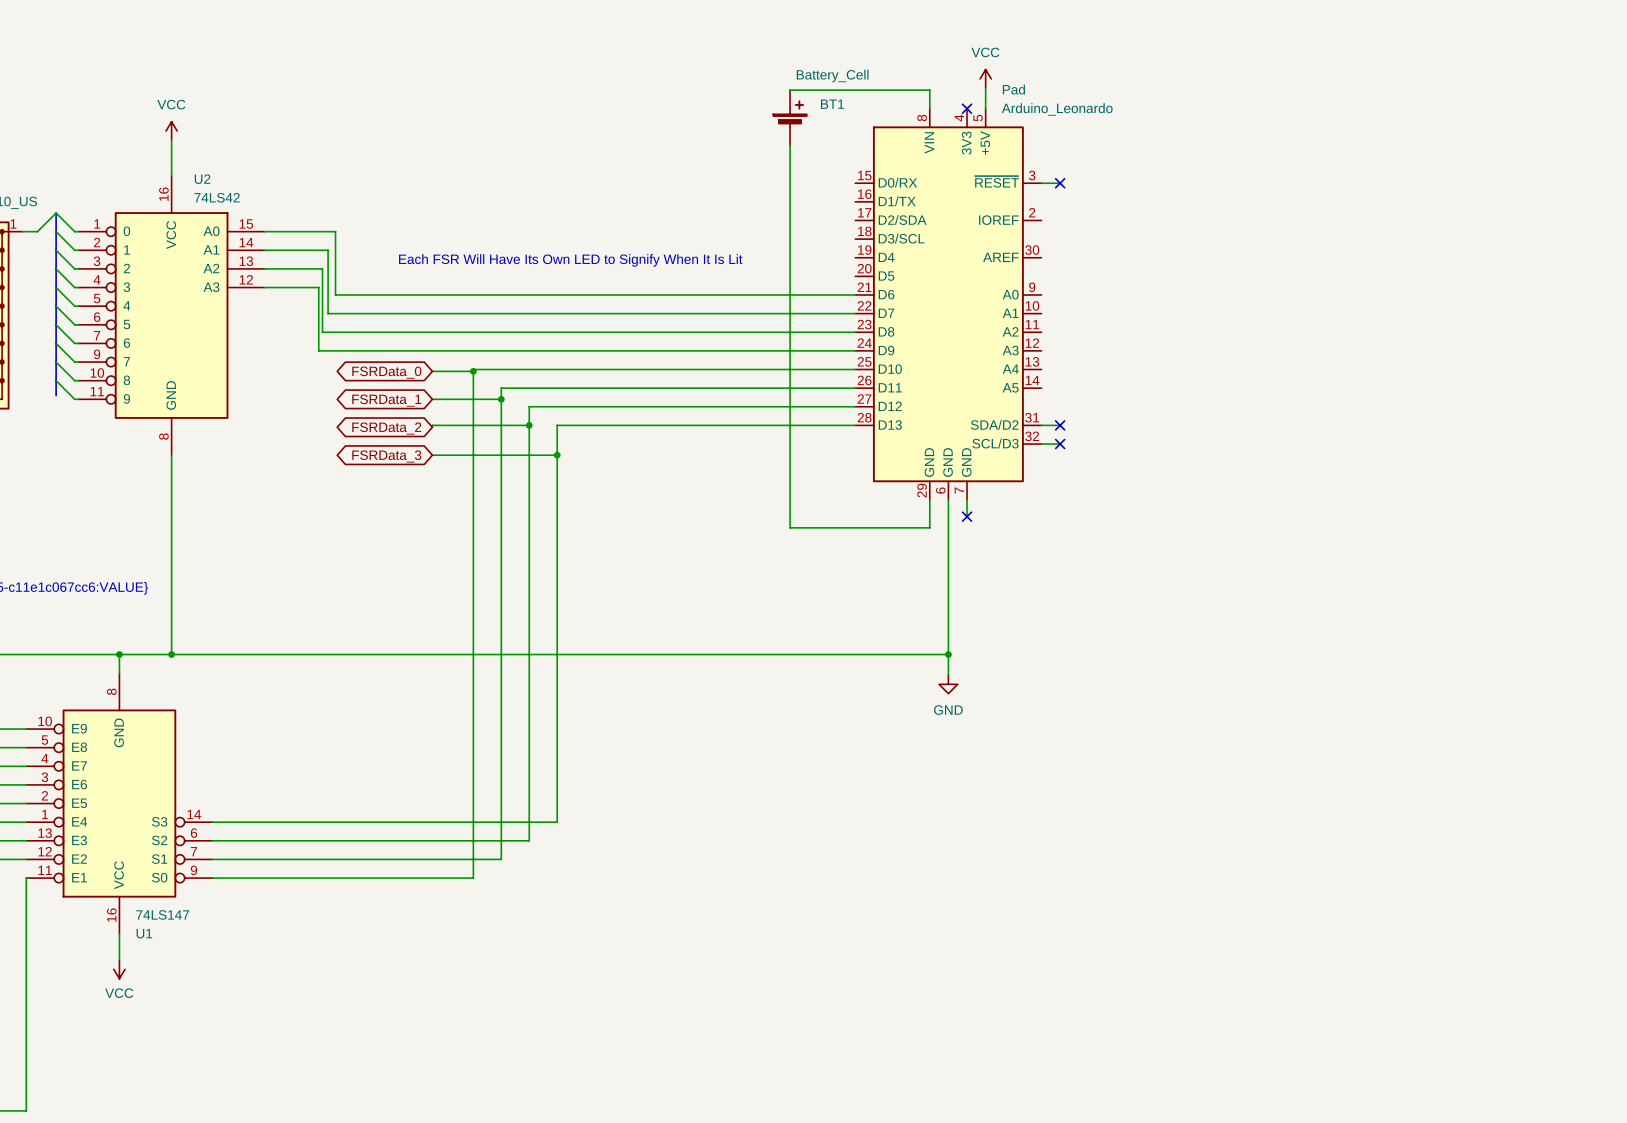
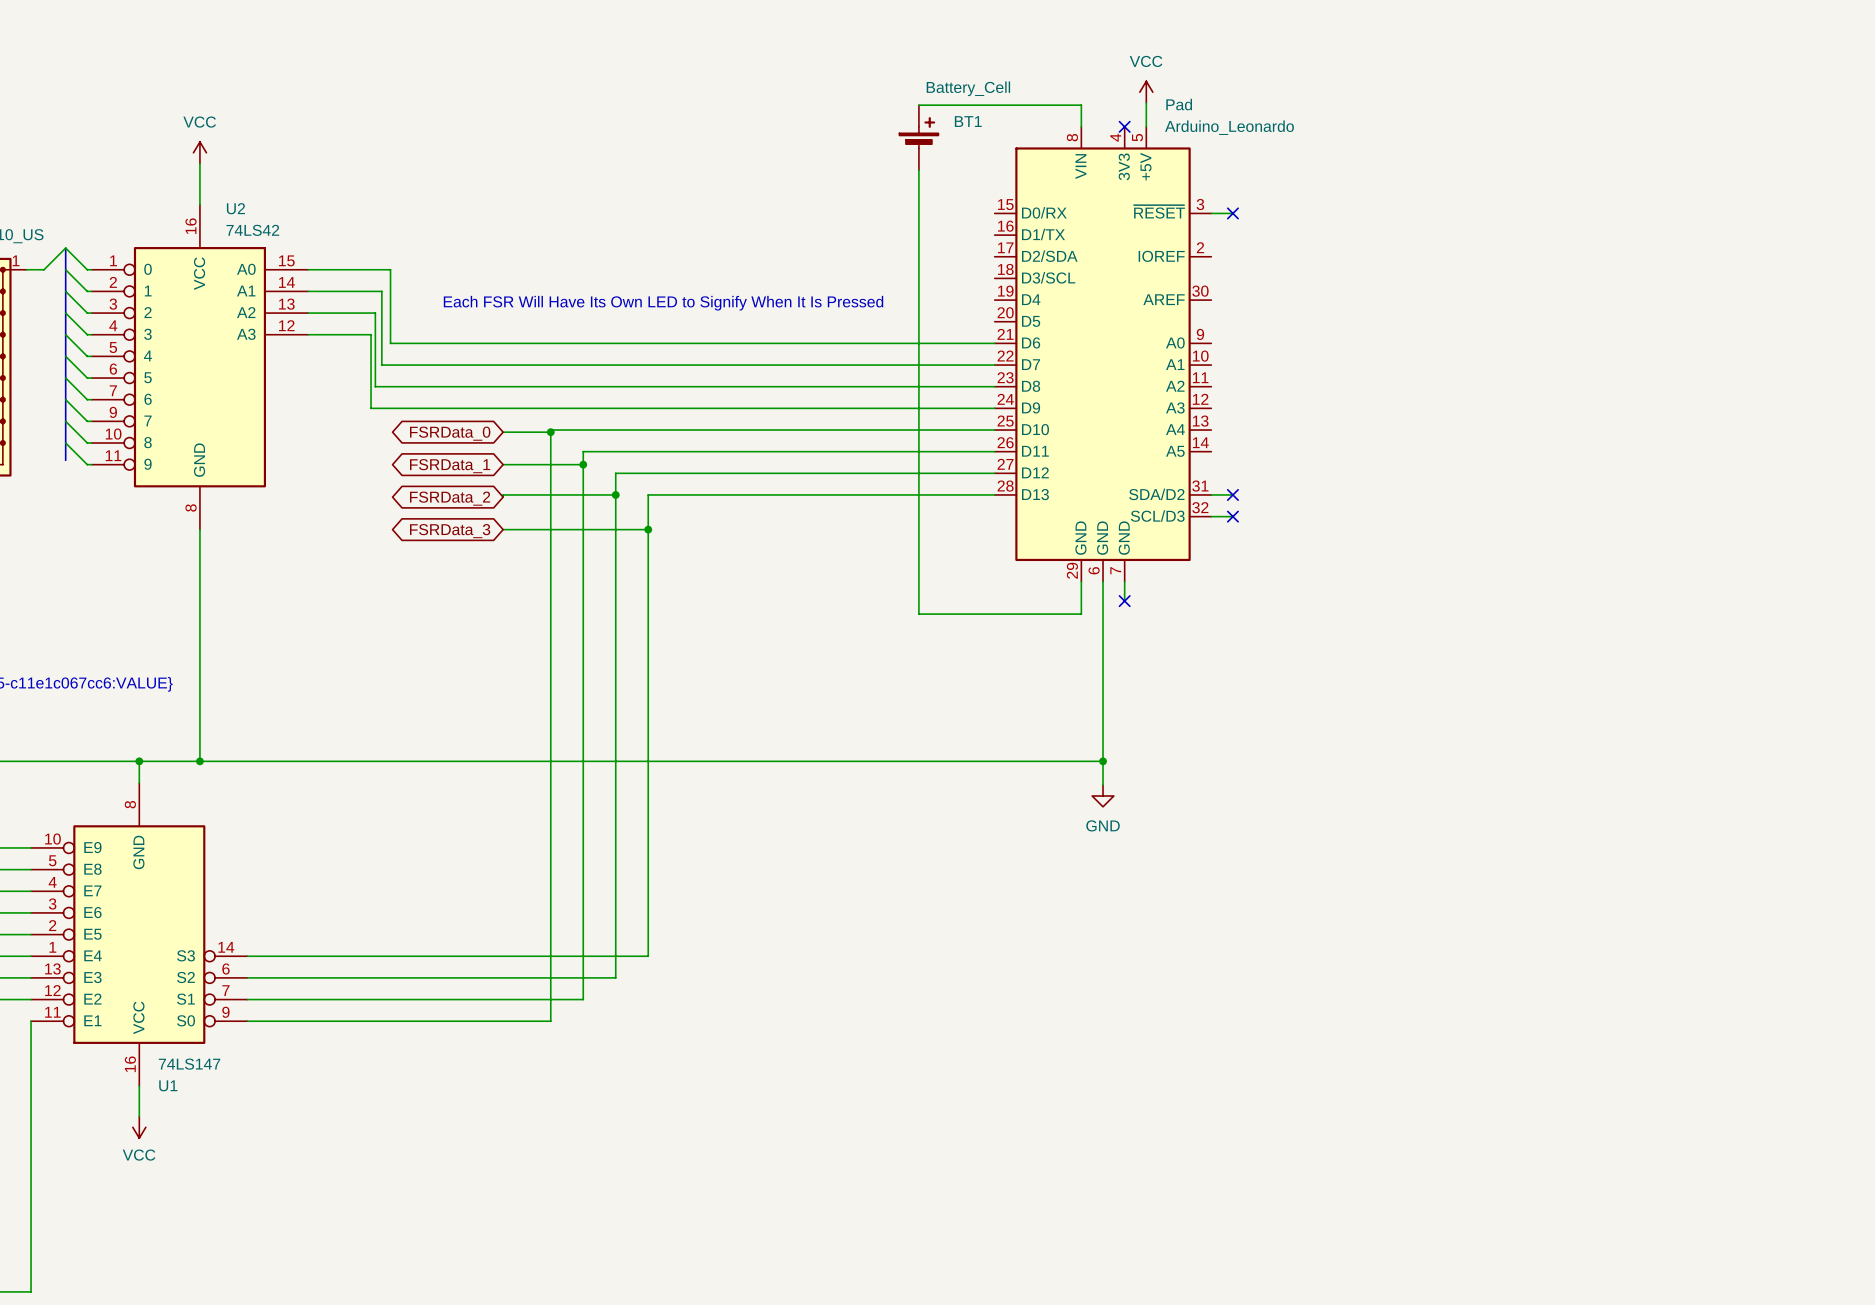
text: Each FSR Will Have Its Own LED to Signify When It Is Lit (570, 260) -> Each FSR Will Have Its Own LED to Signify When It Is Pressed (663, 303)

